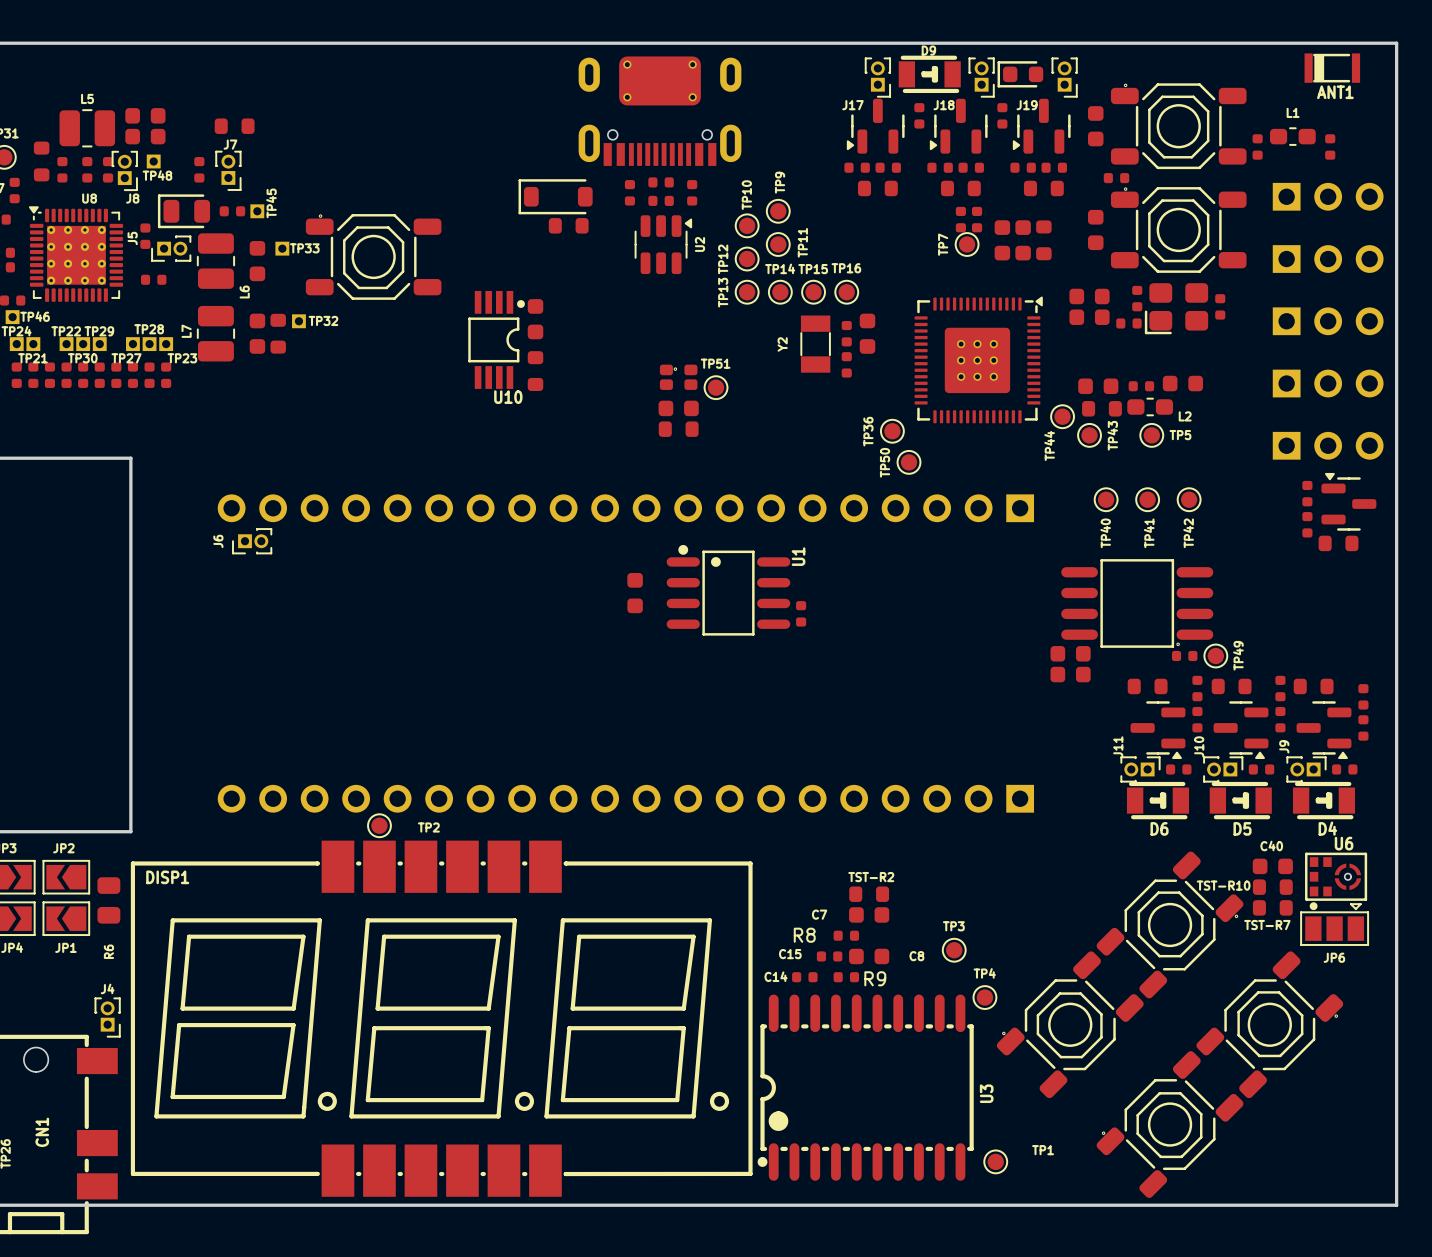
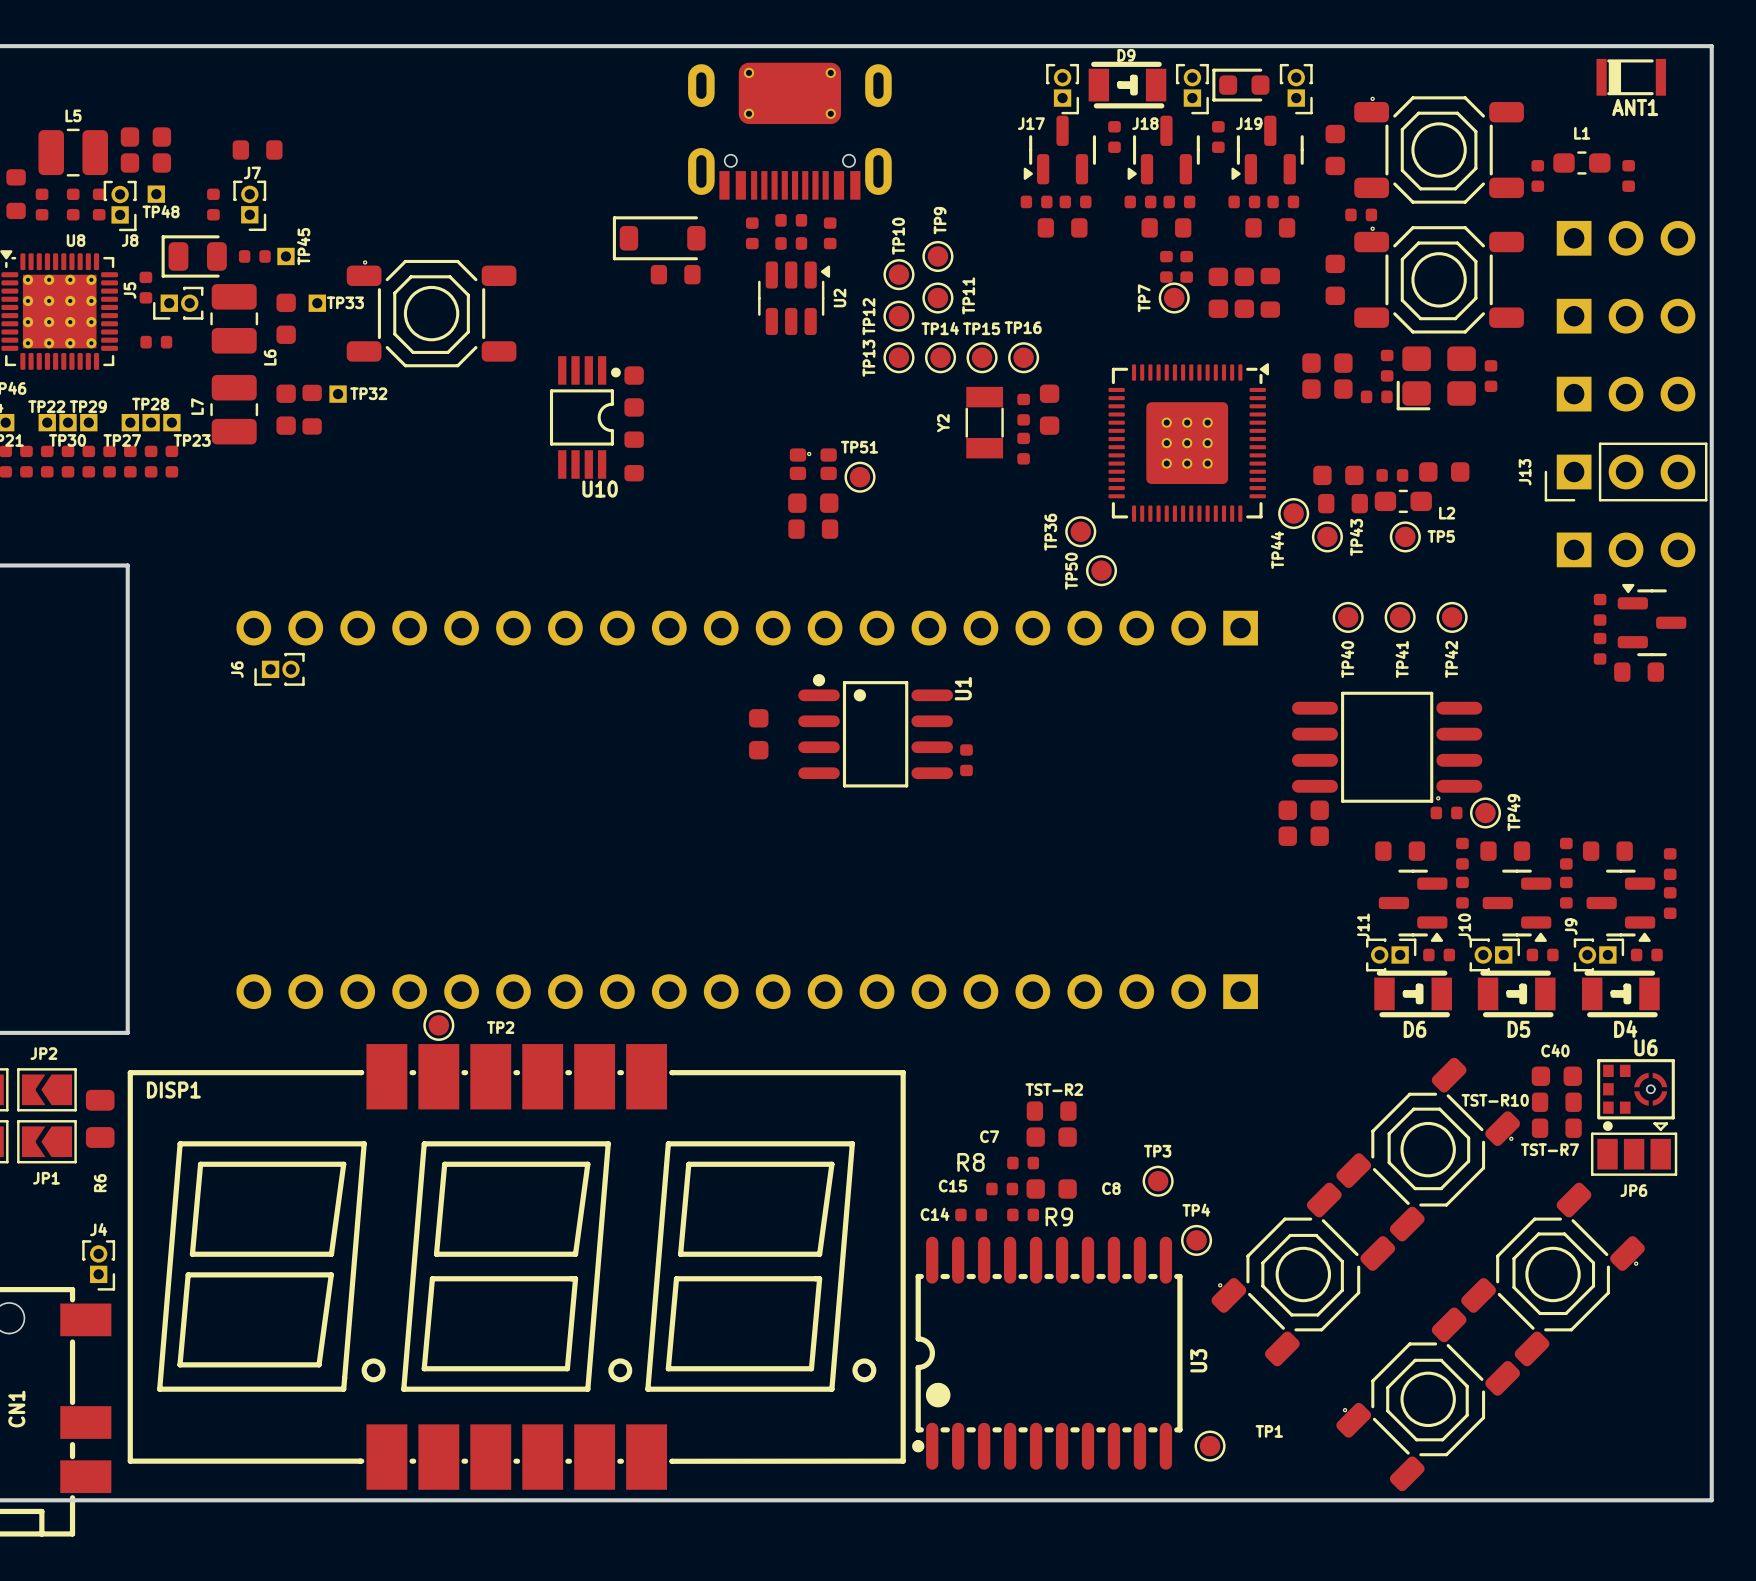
J13 side: bottom (1328, 383) -> top (1626, 472)

